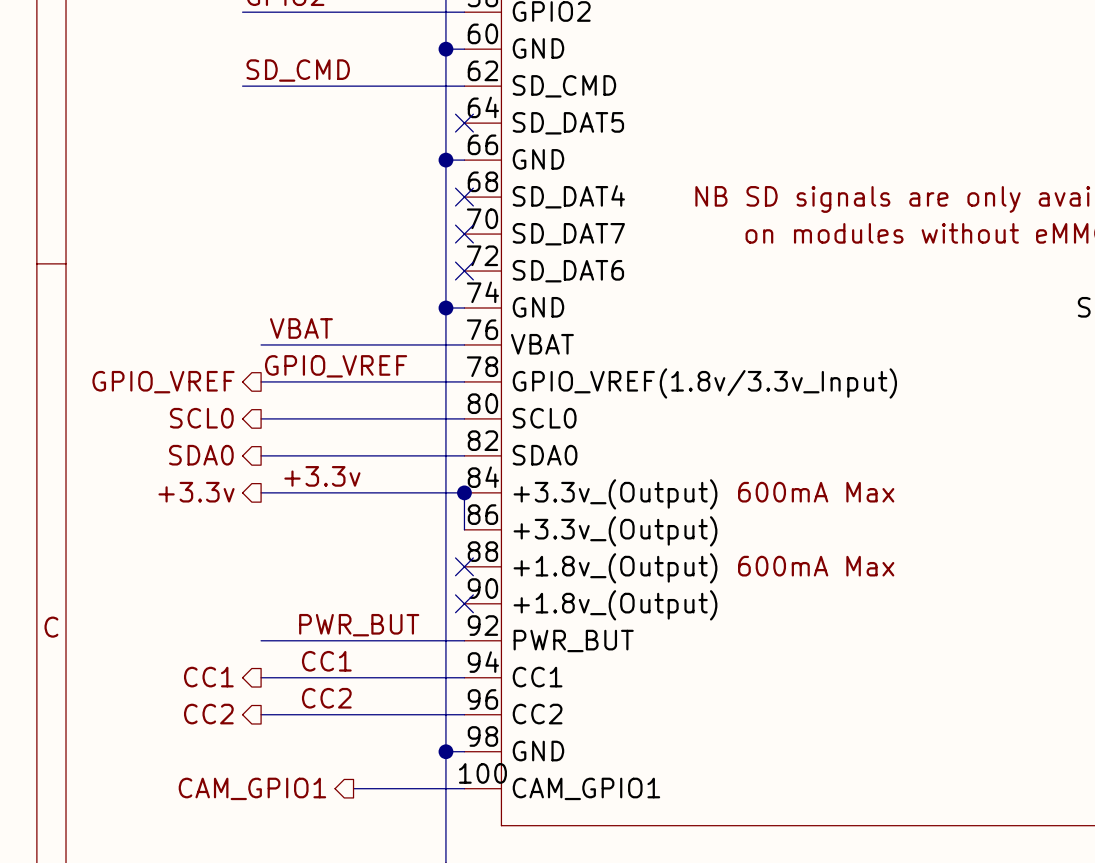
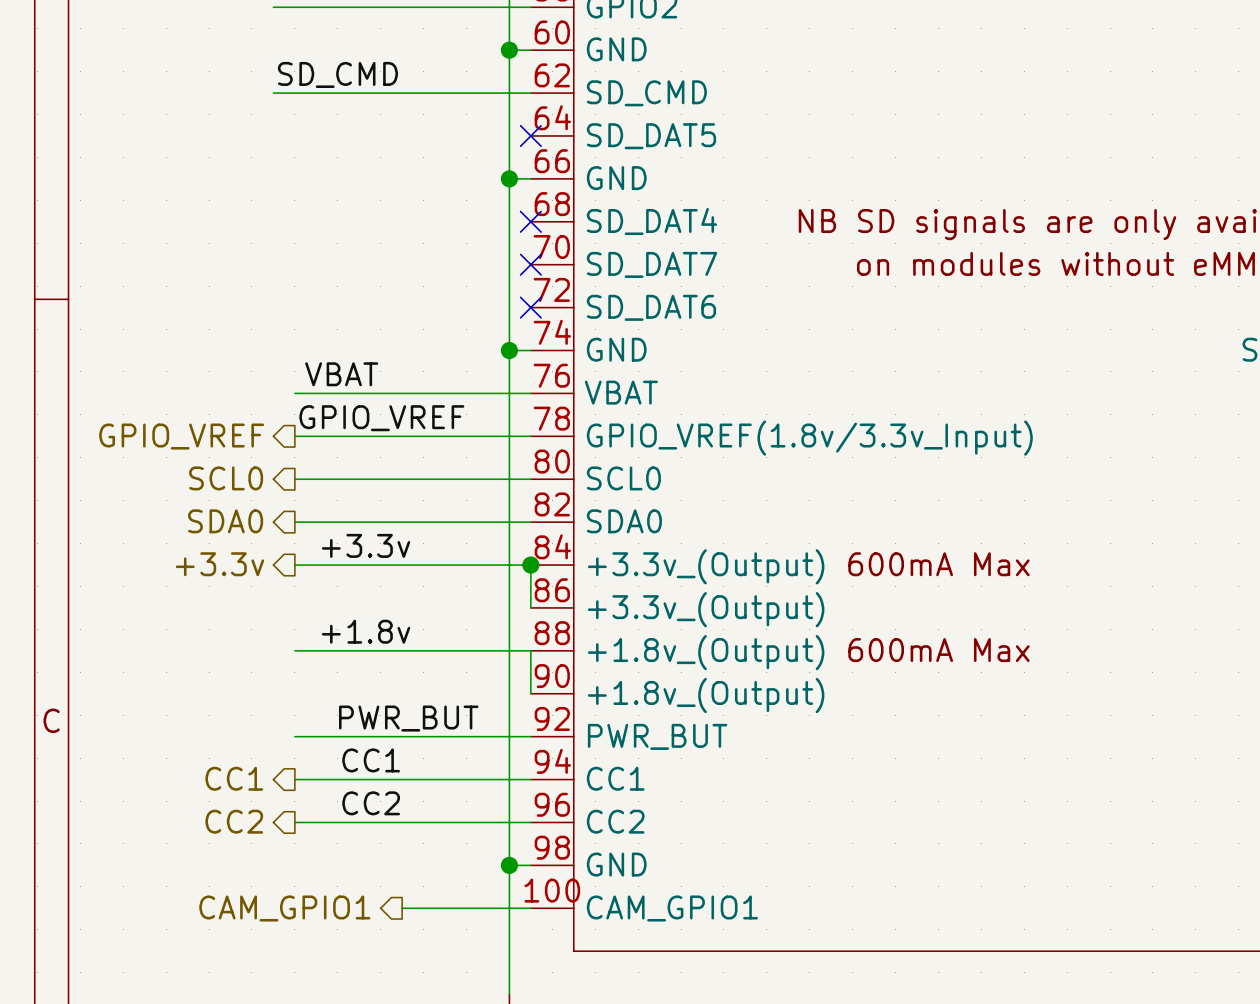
label: none -> +1.8v (366, 631)
wire: none -> (294, 650) (530, 650) (530, 693)
no-connect mark: (464, 566) -> none
no-connect mark: (464, 603) -> none

